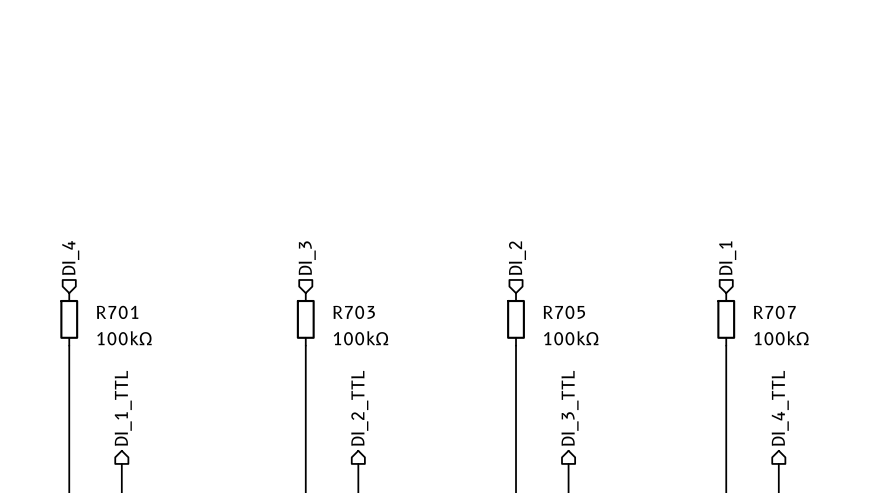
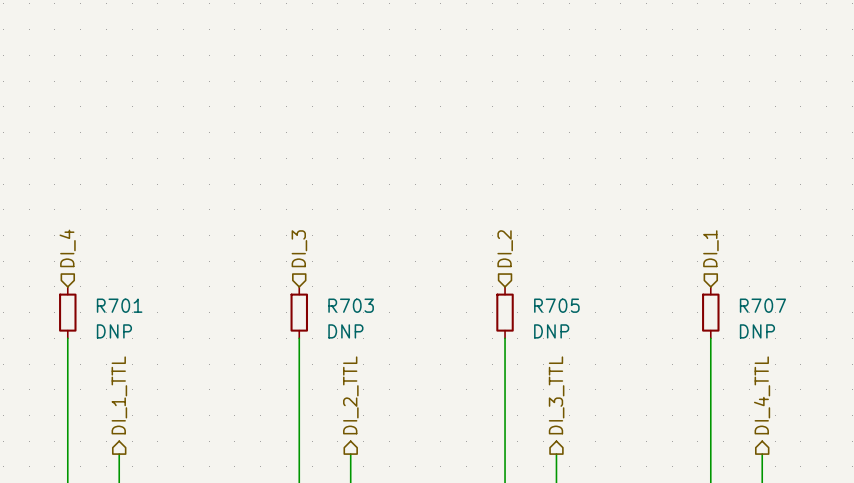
R701 value: none -> DNP (114, 331)
R701 text: 100kΩ (124, 338) -> none
R703 value: none -> DNP (345, 331)
R703 text: 100kΩ (360, 338) -> none
R705 value: none -> DNP (551, 331)
R705 text: 100kΩ (571, 338) -> none
R707 value: none -> DNP (757, 331)
R707 text: 100kΩ (781, 338) -> none

